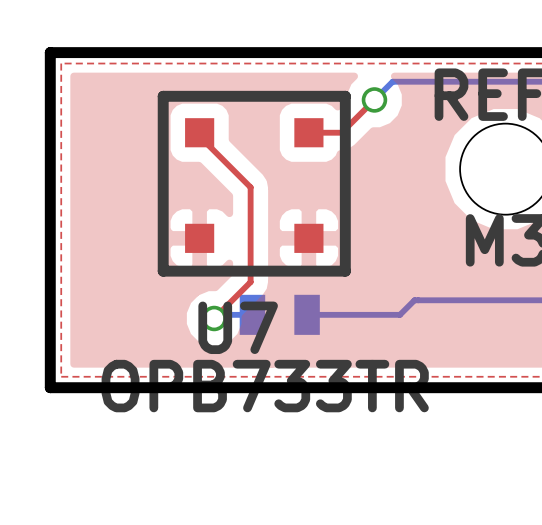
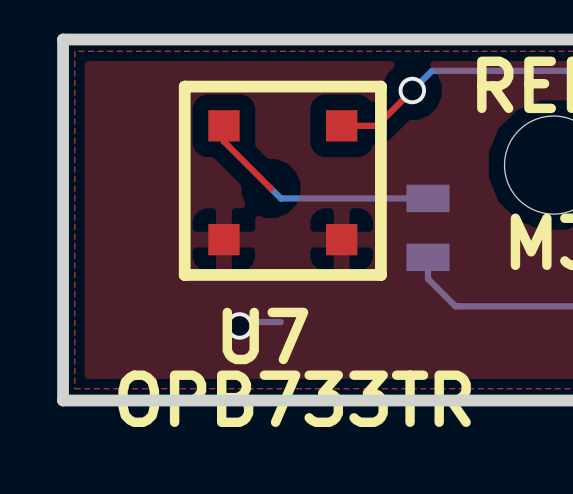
top track: (199, 136) (250, 187) (250, 282) (214, 318) -> (223, 129) (223, 141) (271, 188)
bottom track: none -> (271, 188) (280, 198) (428, 198)
bottom track: (414, 300) (399, 314) (307, 314) -> (455, 306) (428, 278) (428, 257)
part rotation: 0° (279, 314) -> 90° clockwise (428, 227)
part position: (279, 314) -> (428, 227)

